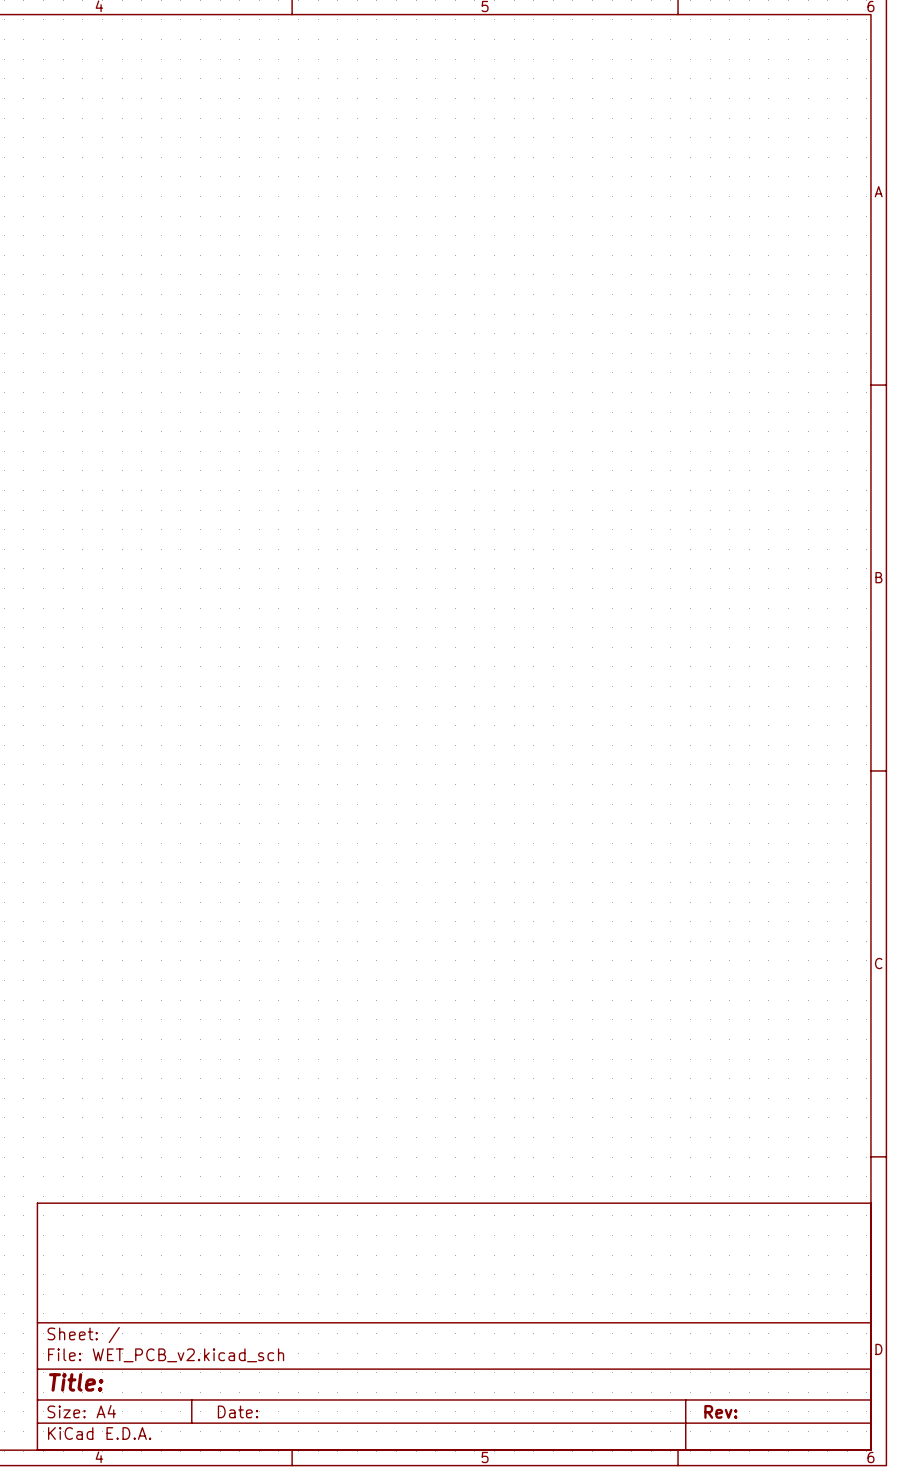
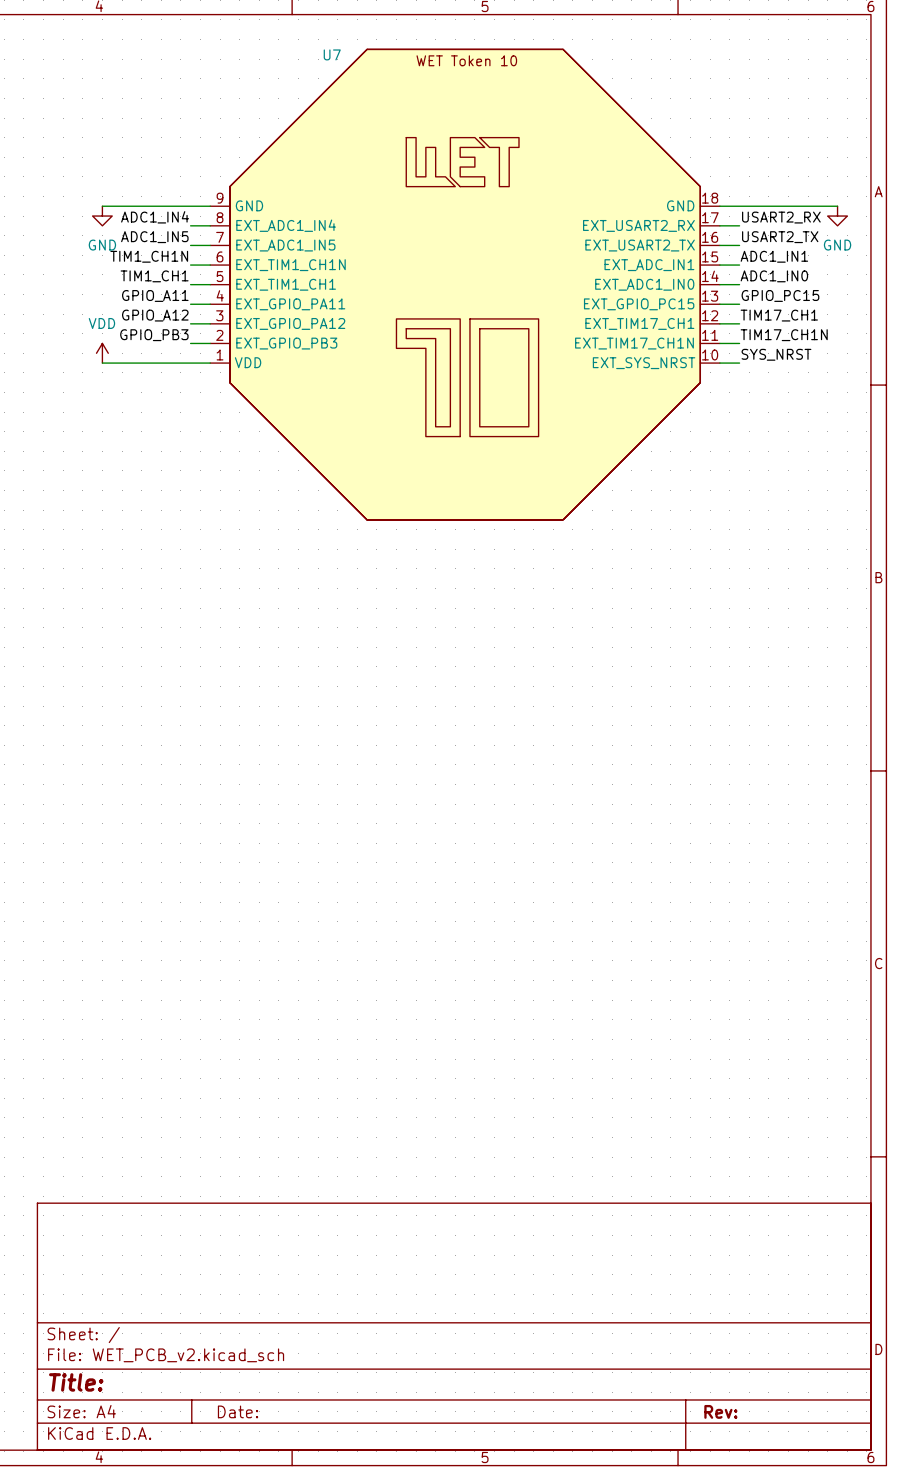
wire: none -> (102, 206) (210, 206)
wire: none -> (719, 206) (837, 206)
power symbol: none -> GND (102, 216)
power symbol: none -> GND (837, 216)
label: none -> ADC1_IN4 (155, 217)
label: none -> USART2_RX (781, 217)
wire: none -> (190, 225) (210, 225)
wire: none -> (719, 225) (739, 225)
label: none -> ADC1_IN5 (154, 237)
label: none -> USART2_TX (780, 237)
wire: none -> (190, 245) (210, 245)
wire: none -> (719, 245) (739, 245)
label: none -> TIM1_CH1N (149, 256)
label: none -> ADC1_IN1 (774, 256)
wire: none -> (190, 265) (210, 265)
wire: none -> (719, 265) (739, 265)
label: none -> TIM1_CH1 (154, 276)
label: none -> ADC1_IN0 (774, 276)
wire: none -> (190, 284) (210, 284)
U7: none -> (465, 284)
wire: none -> (719, 284) (739, 284)
label: none -> GPIO_A11 (155, 295)
label: none -> GPIO_PC15 (780, 295)
wire: none -> (190, 304) (210, 304)
wire: none -> (719, 304) (739, 304)
label: none -> GPIO_A12 (155, 315)
label: none -> TIM17_CH1 (779, 315)
wire: none -> (190, 323) (210, 323)
wire: none -> (719, 323) (739, 323)
label: none -> GPIO_PB3 (154, 335)
label: none -> TIM17_CH1N (784, 335)
wire: none -> (190, 343) (210, 343)
wire: none -> (719, 343) (739, 343)
power symbol: none -> VDD (102, 353)
label: none -> SYS_NRST (776, 354)
wire: none -> (102, 363) (210, 363)
wire: none -> (719, 363) (739, 363)

